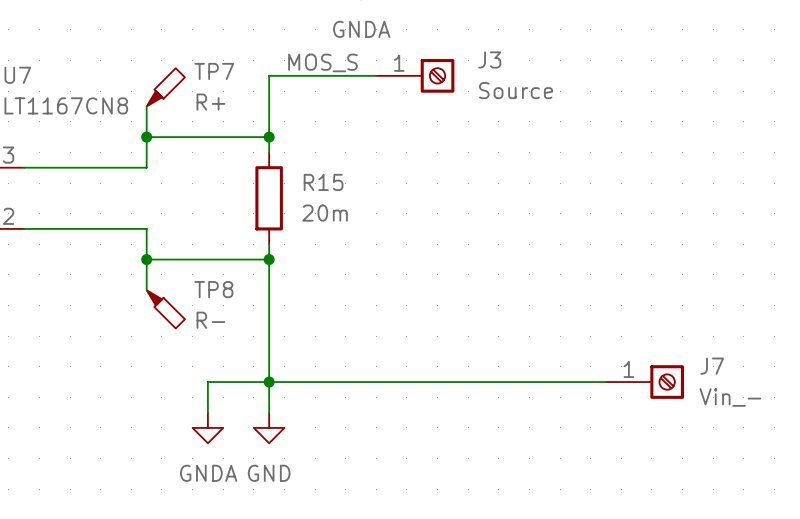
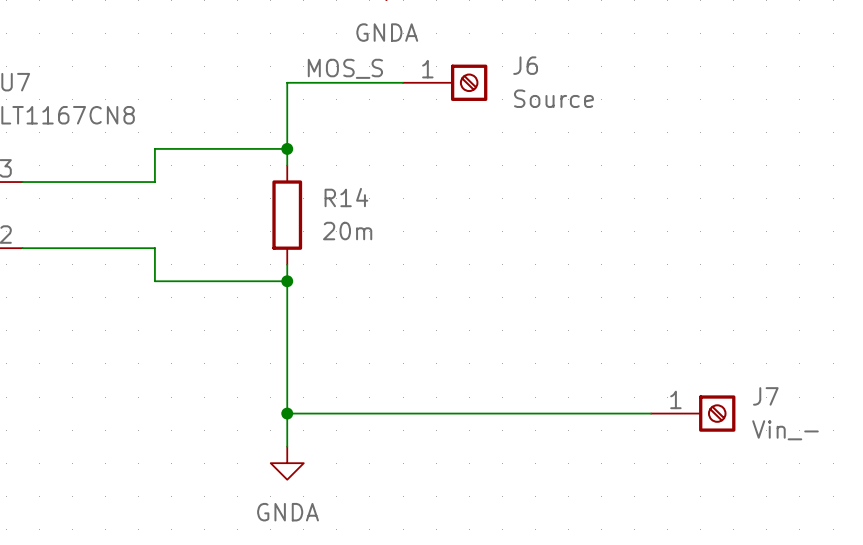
J3 name: J3 (489, 59) -> J6 (525, 65)
TP7: R+ (165, 87) -> none
wire: (146, 106) (146, 137) -> none
junction: (146, 137) -> none
R15 name: R15 (323, 182) -> R14 (346, 197)
wire: (146, 259) (146, 290) -> none
junction: (146, 259) -> none
TP8: R- (165, 309) -> none
wire: (269, 382) (207, 382) (207, 412) -> none
power symbol: GNDA (207, 427) -> none
power symbol: GND (269, 427) -> GNDA (287, 463)

